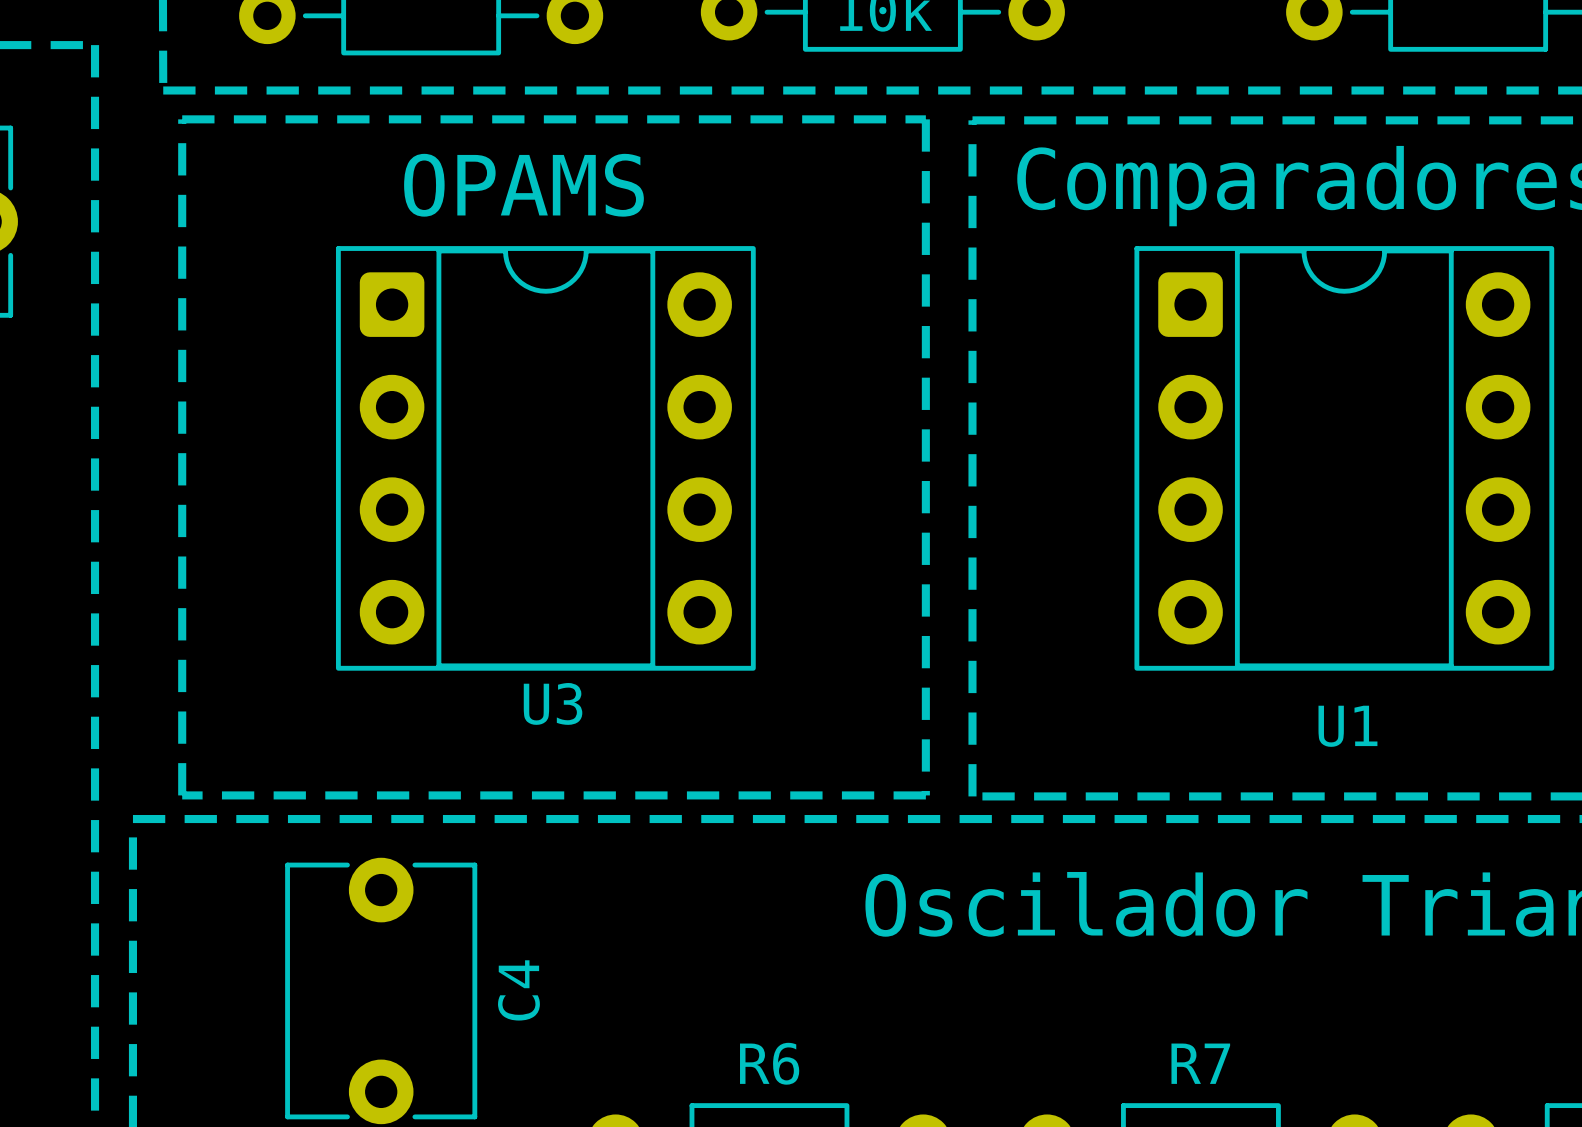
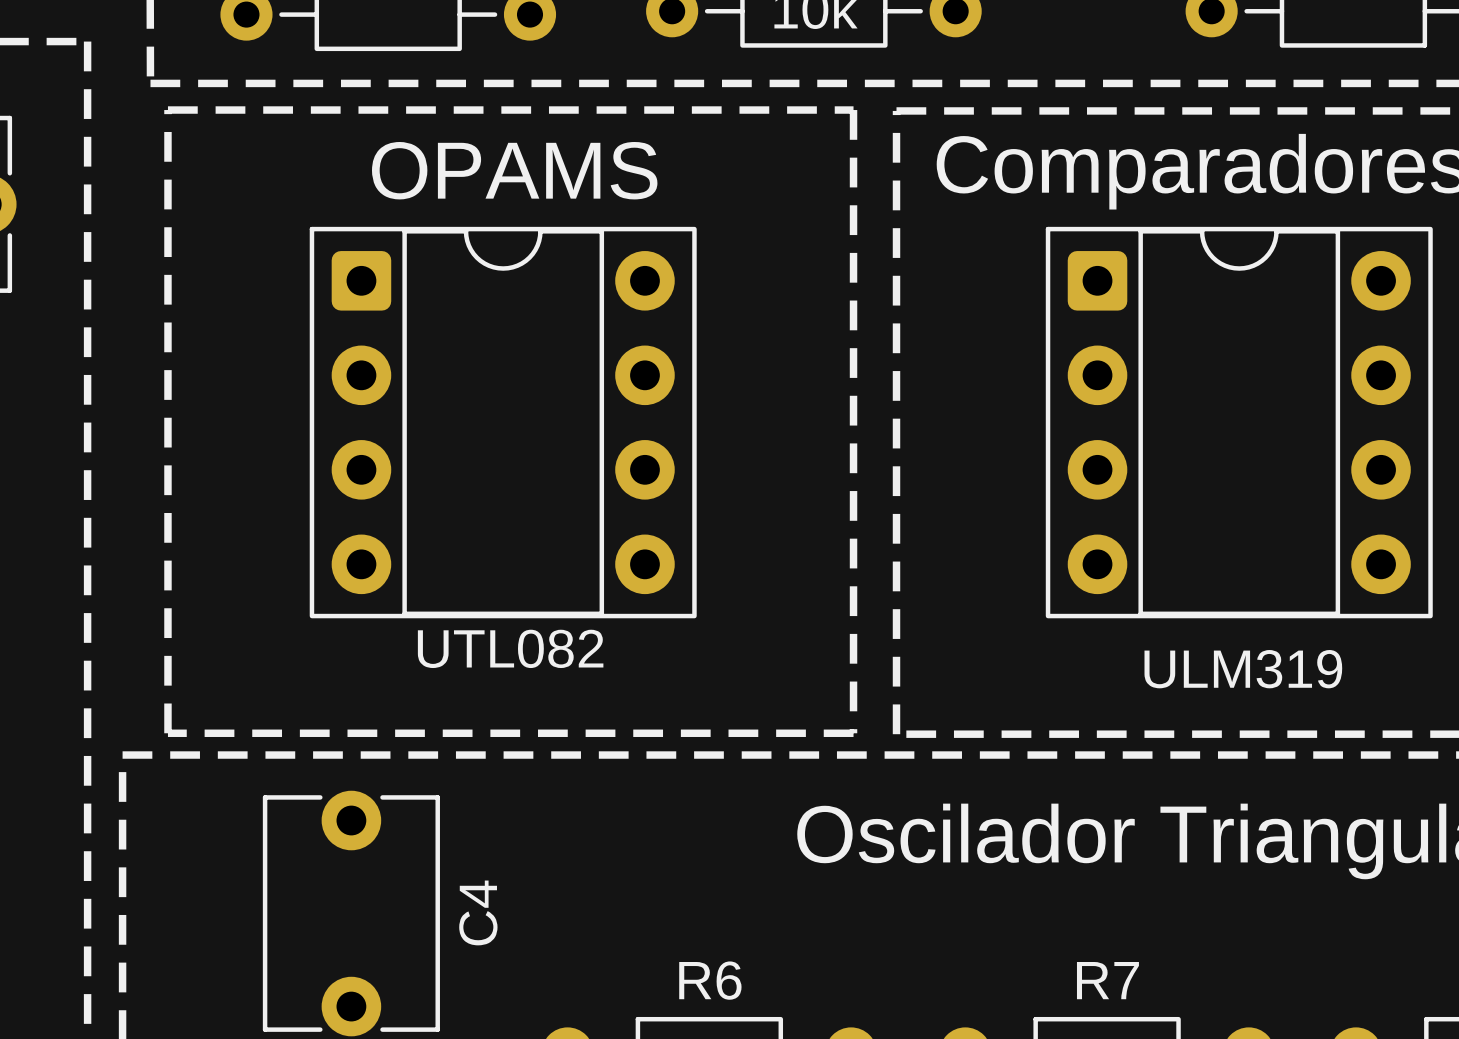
U3 name: U3 (553, 703) -> UTL082 (510, 648)
U1 name: U1 (1347, 726) -> ULM319 (1243, 669)

